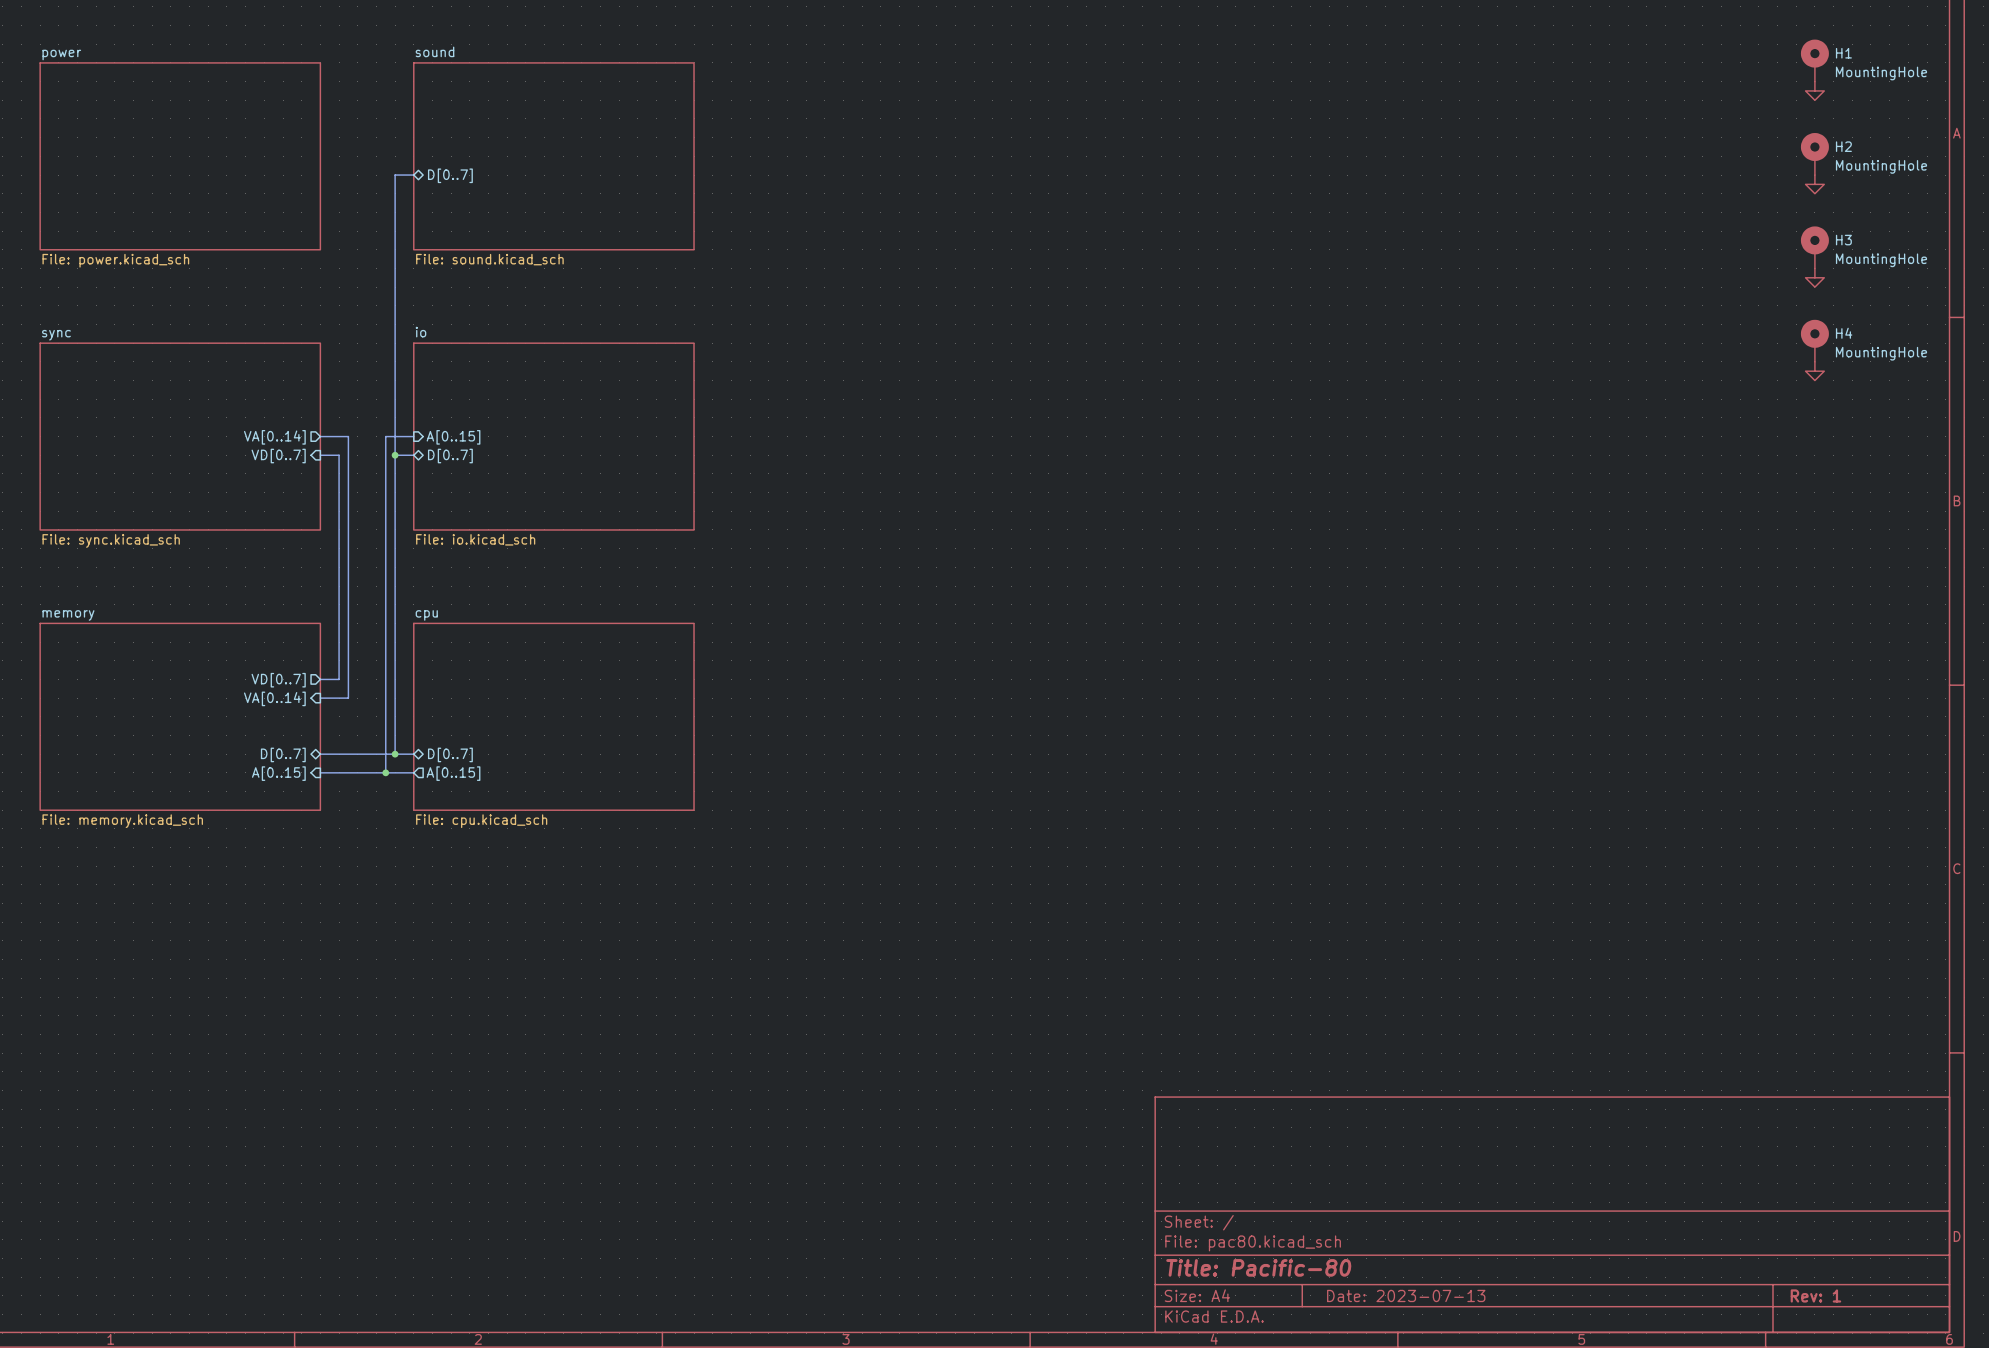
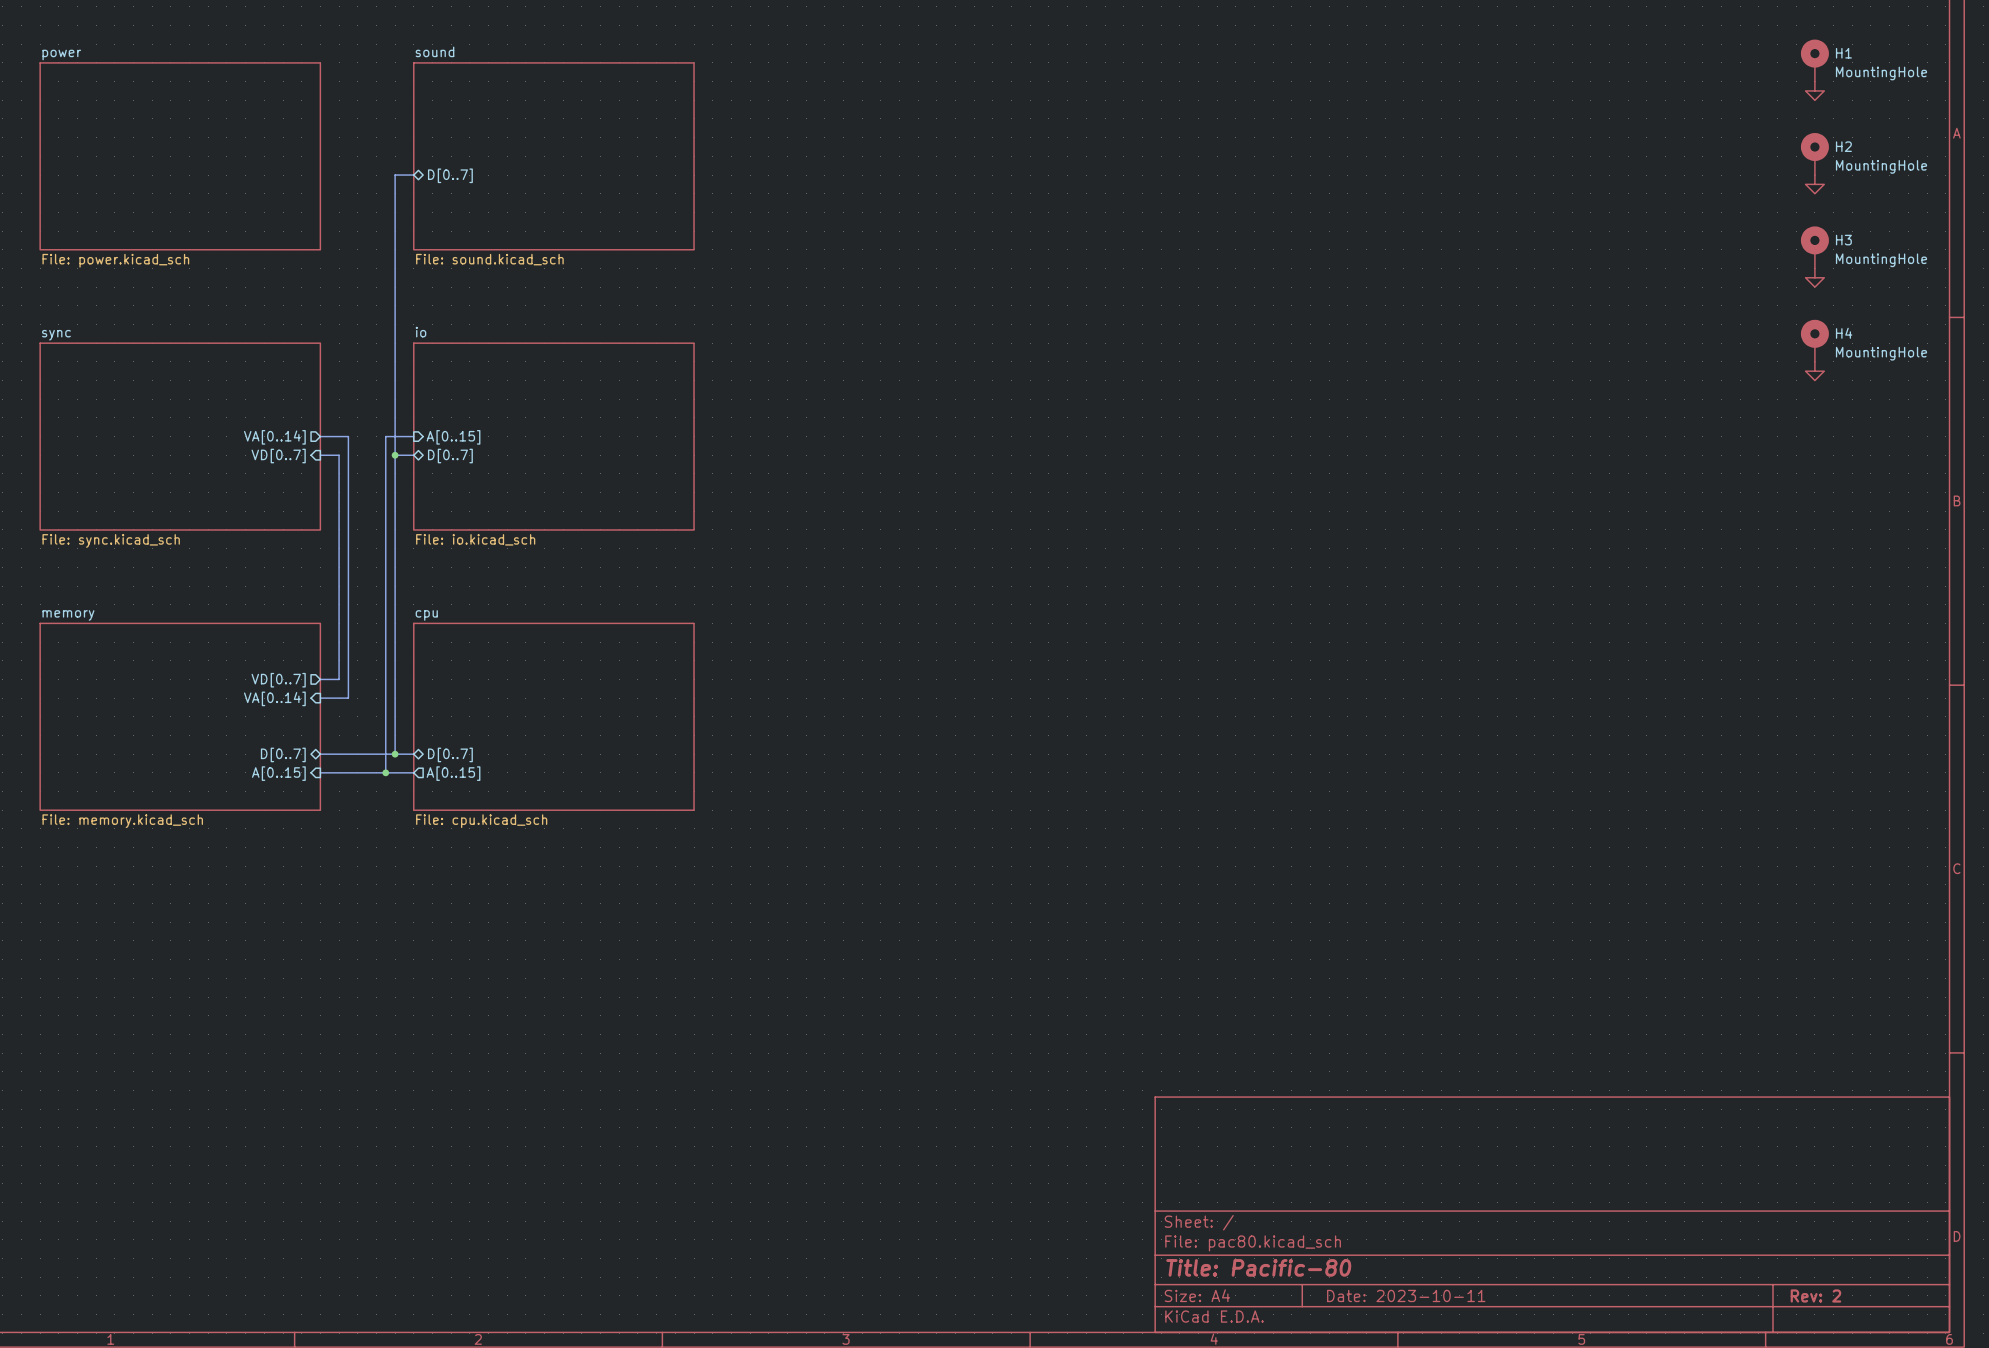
title block: Date: 2023-07-13 (1406, 1295) -> Date: 2023-10-11 (1406, 1295)
title block: Rev: 1 (1815, 1295) -> Rev: 2 (1815, 1295)

